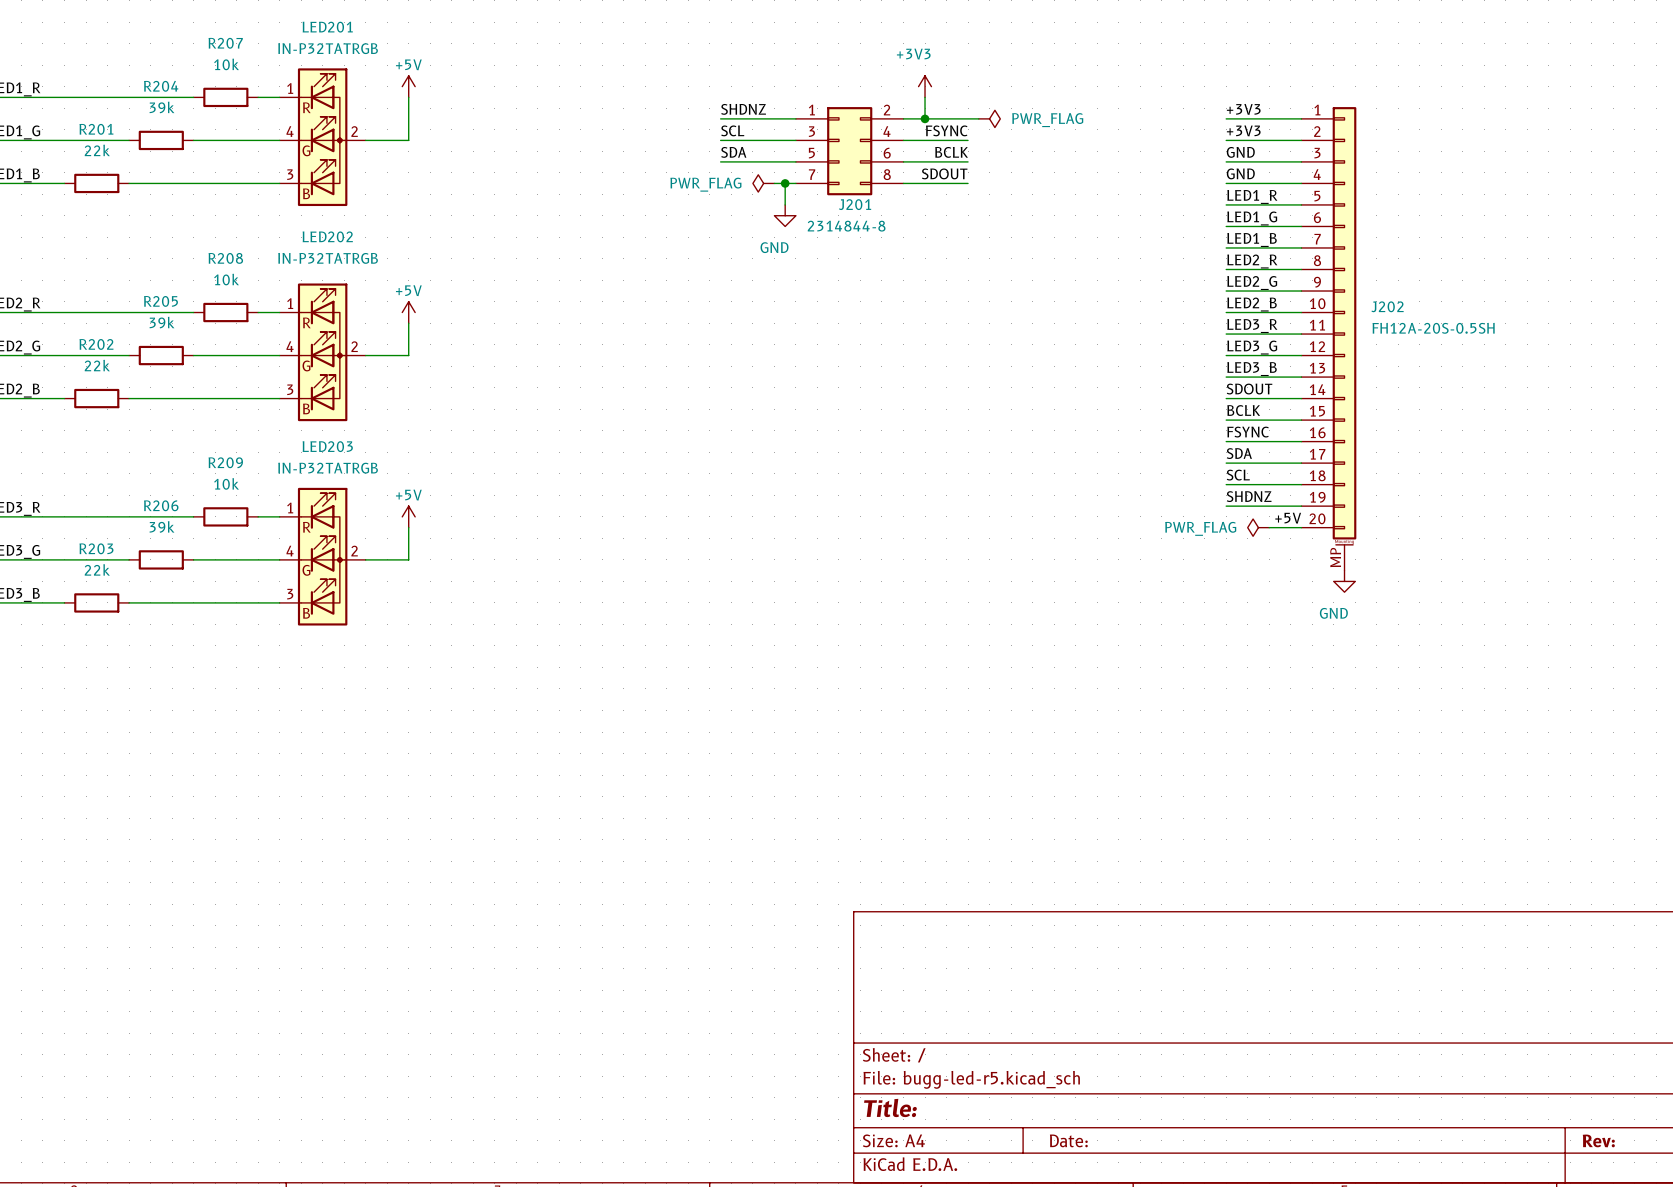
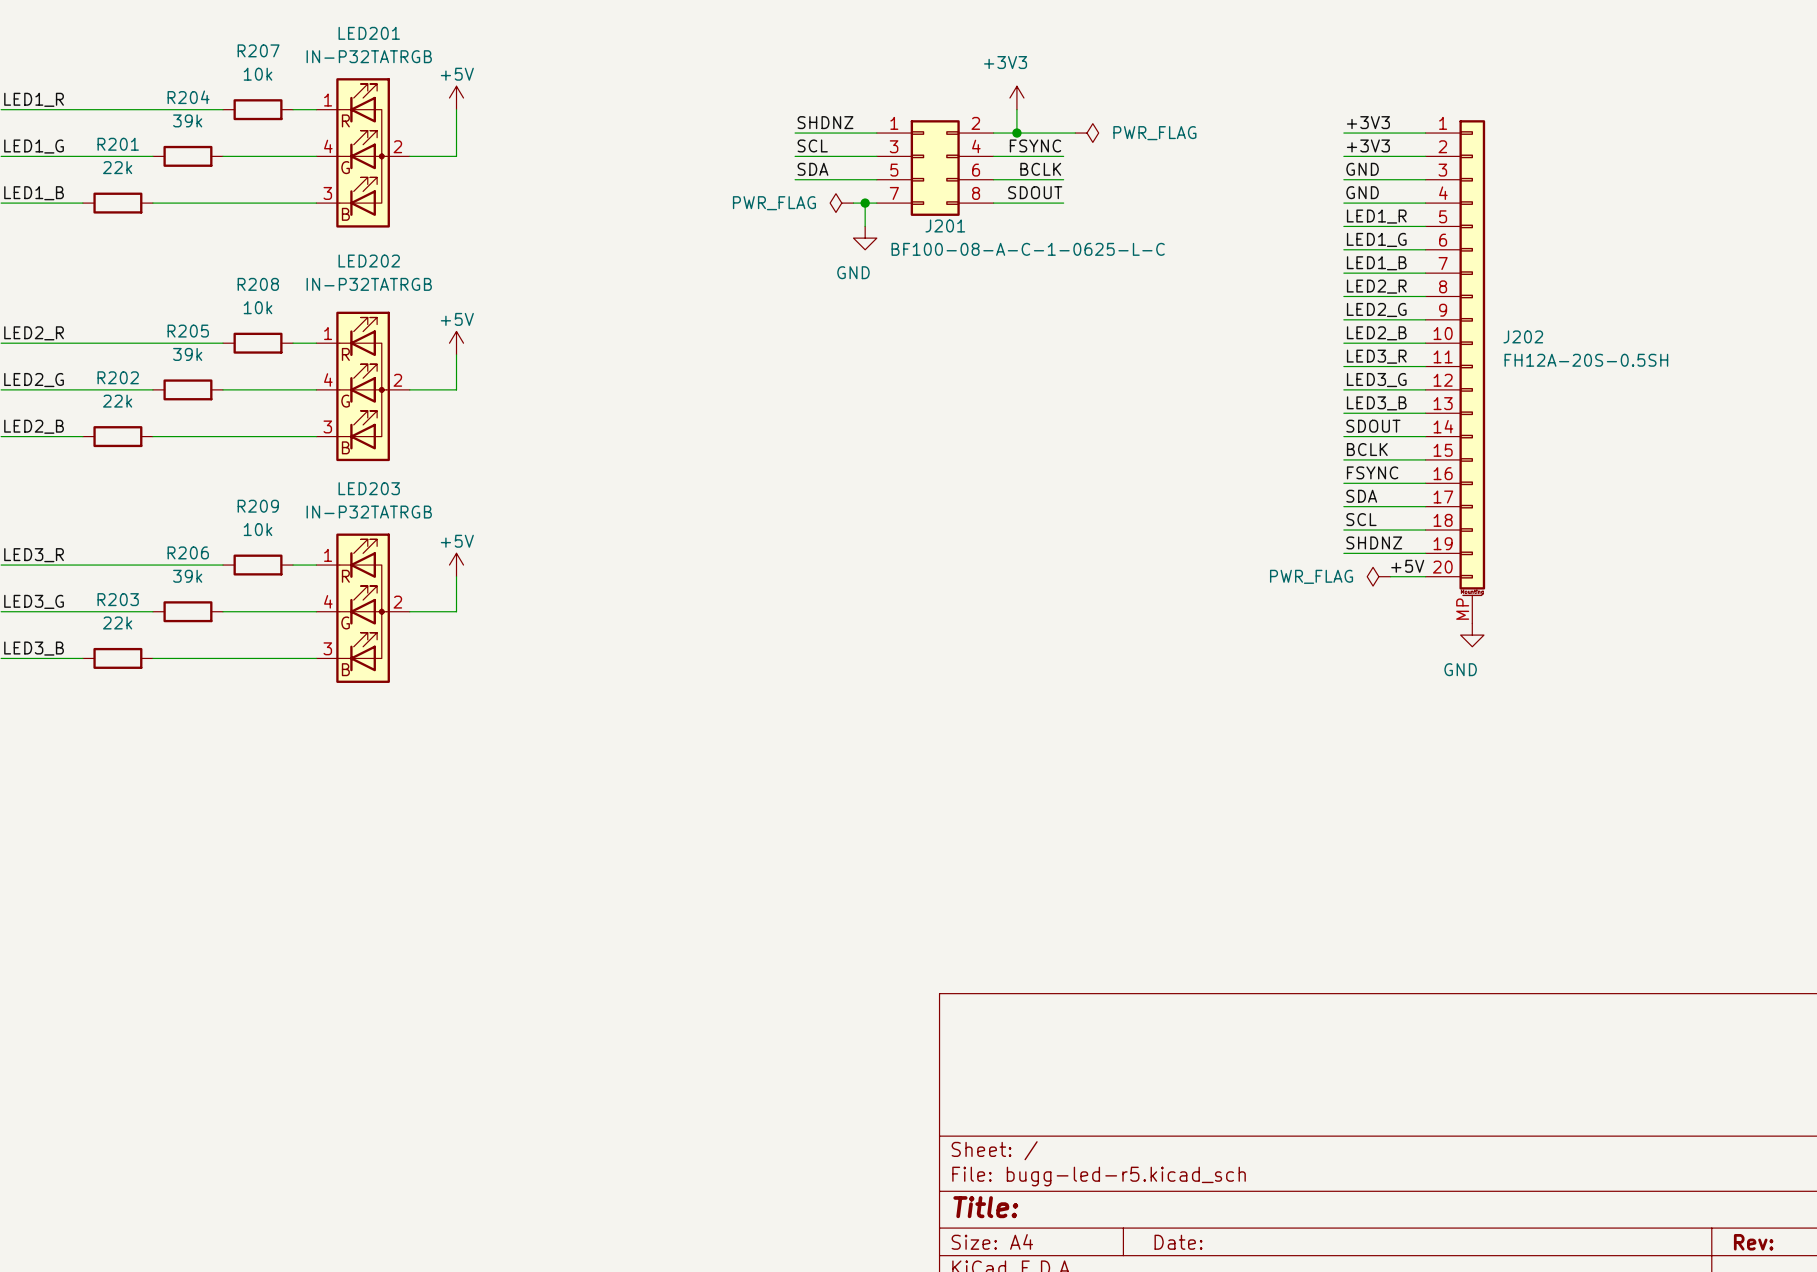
J201 value: 2314844-8 (846, 226) -> BF100-08-A-C-1-0625-L-C (1028, 249)

